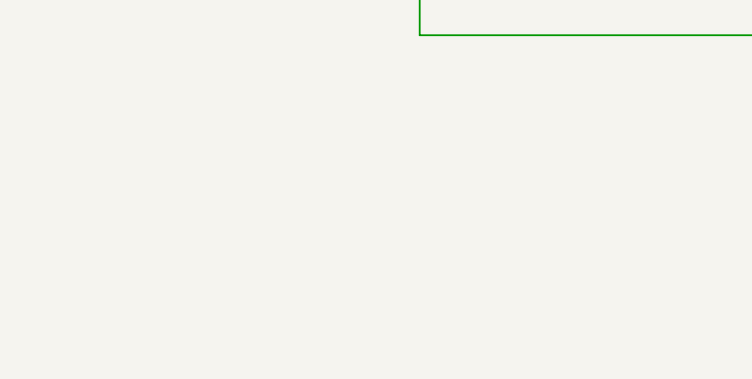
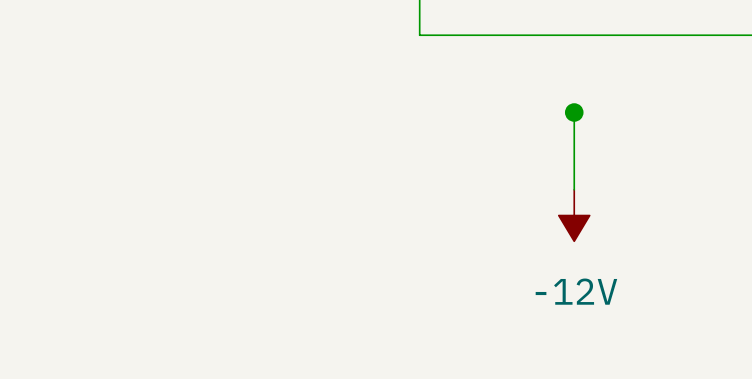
wire: none -> (574, 112) (574, 189)
junction: none -> (574, 112)
power symbol: none -> -12V (574, 215)

